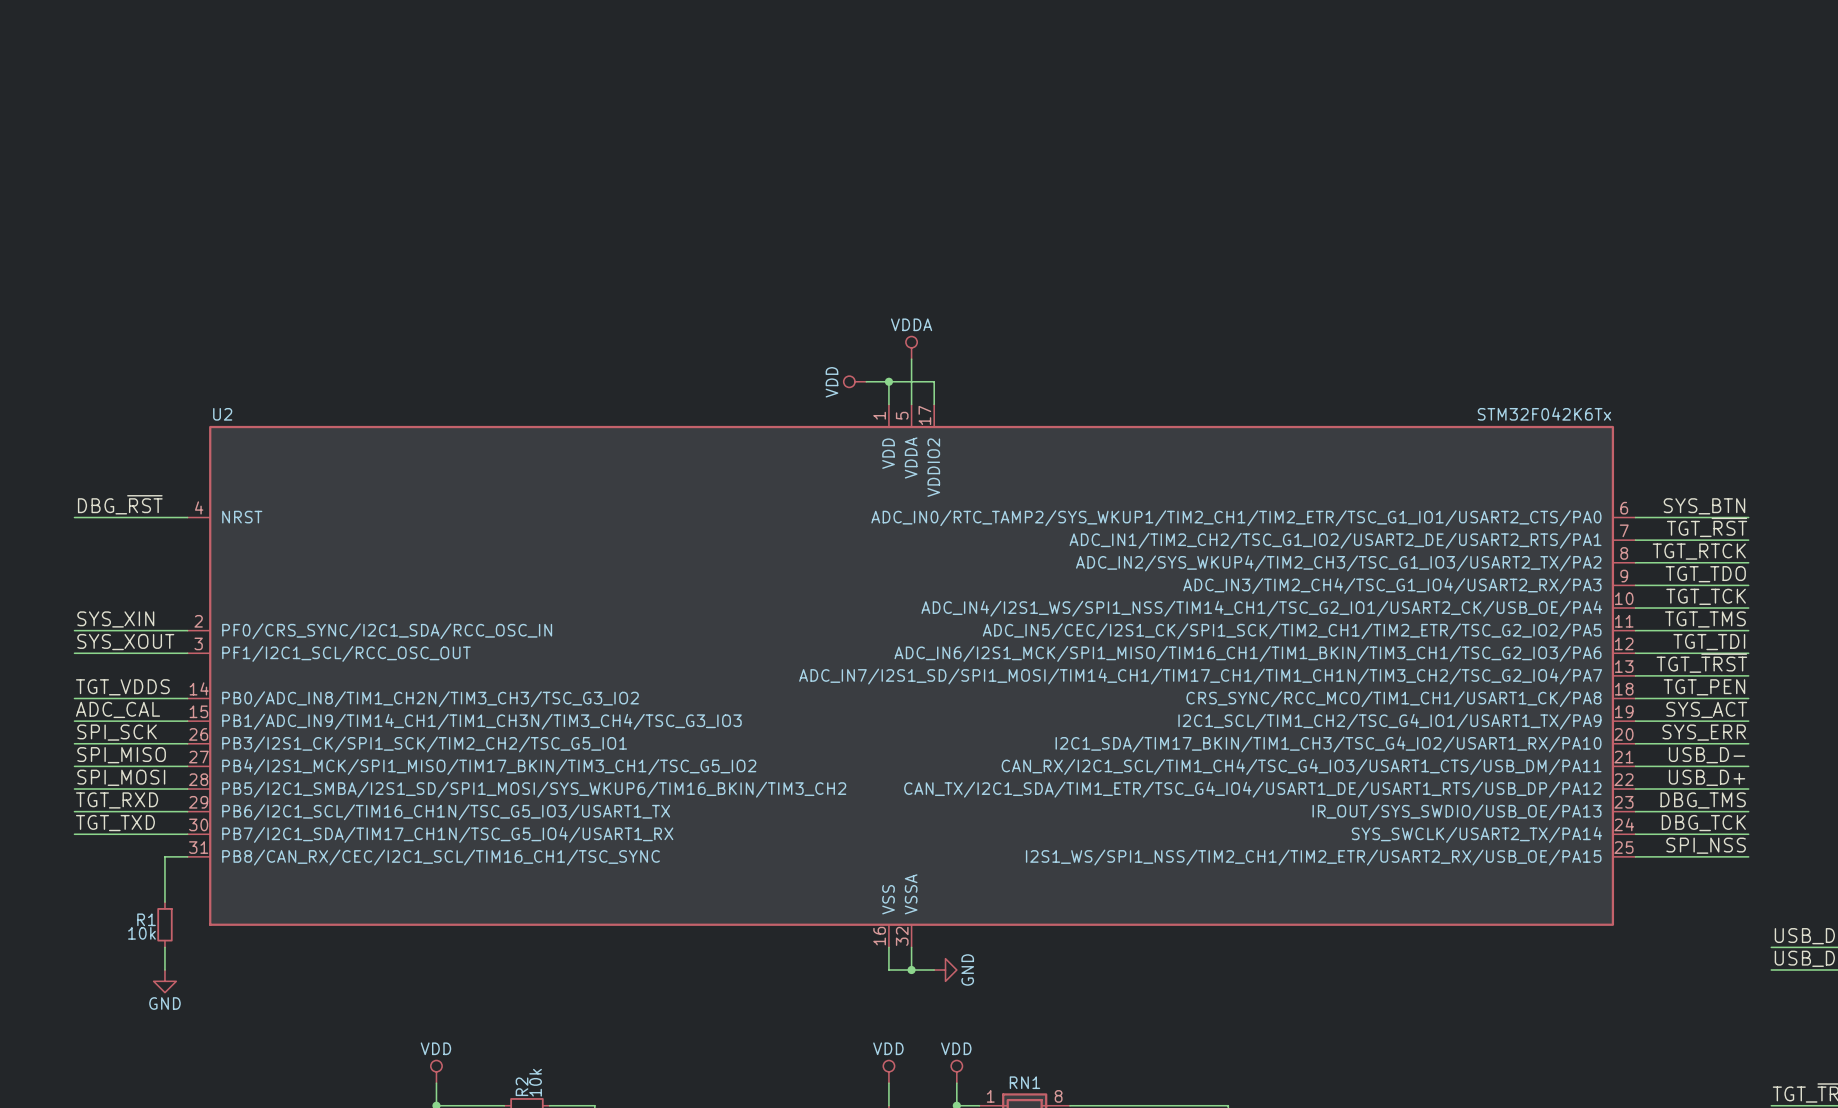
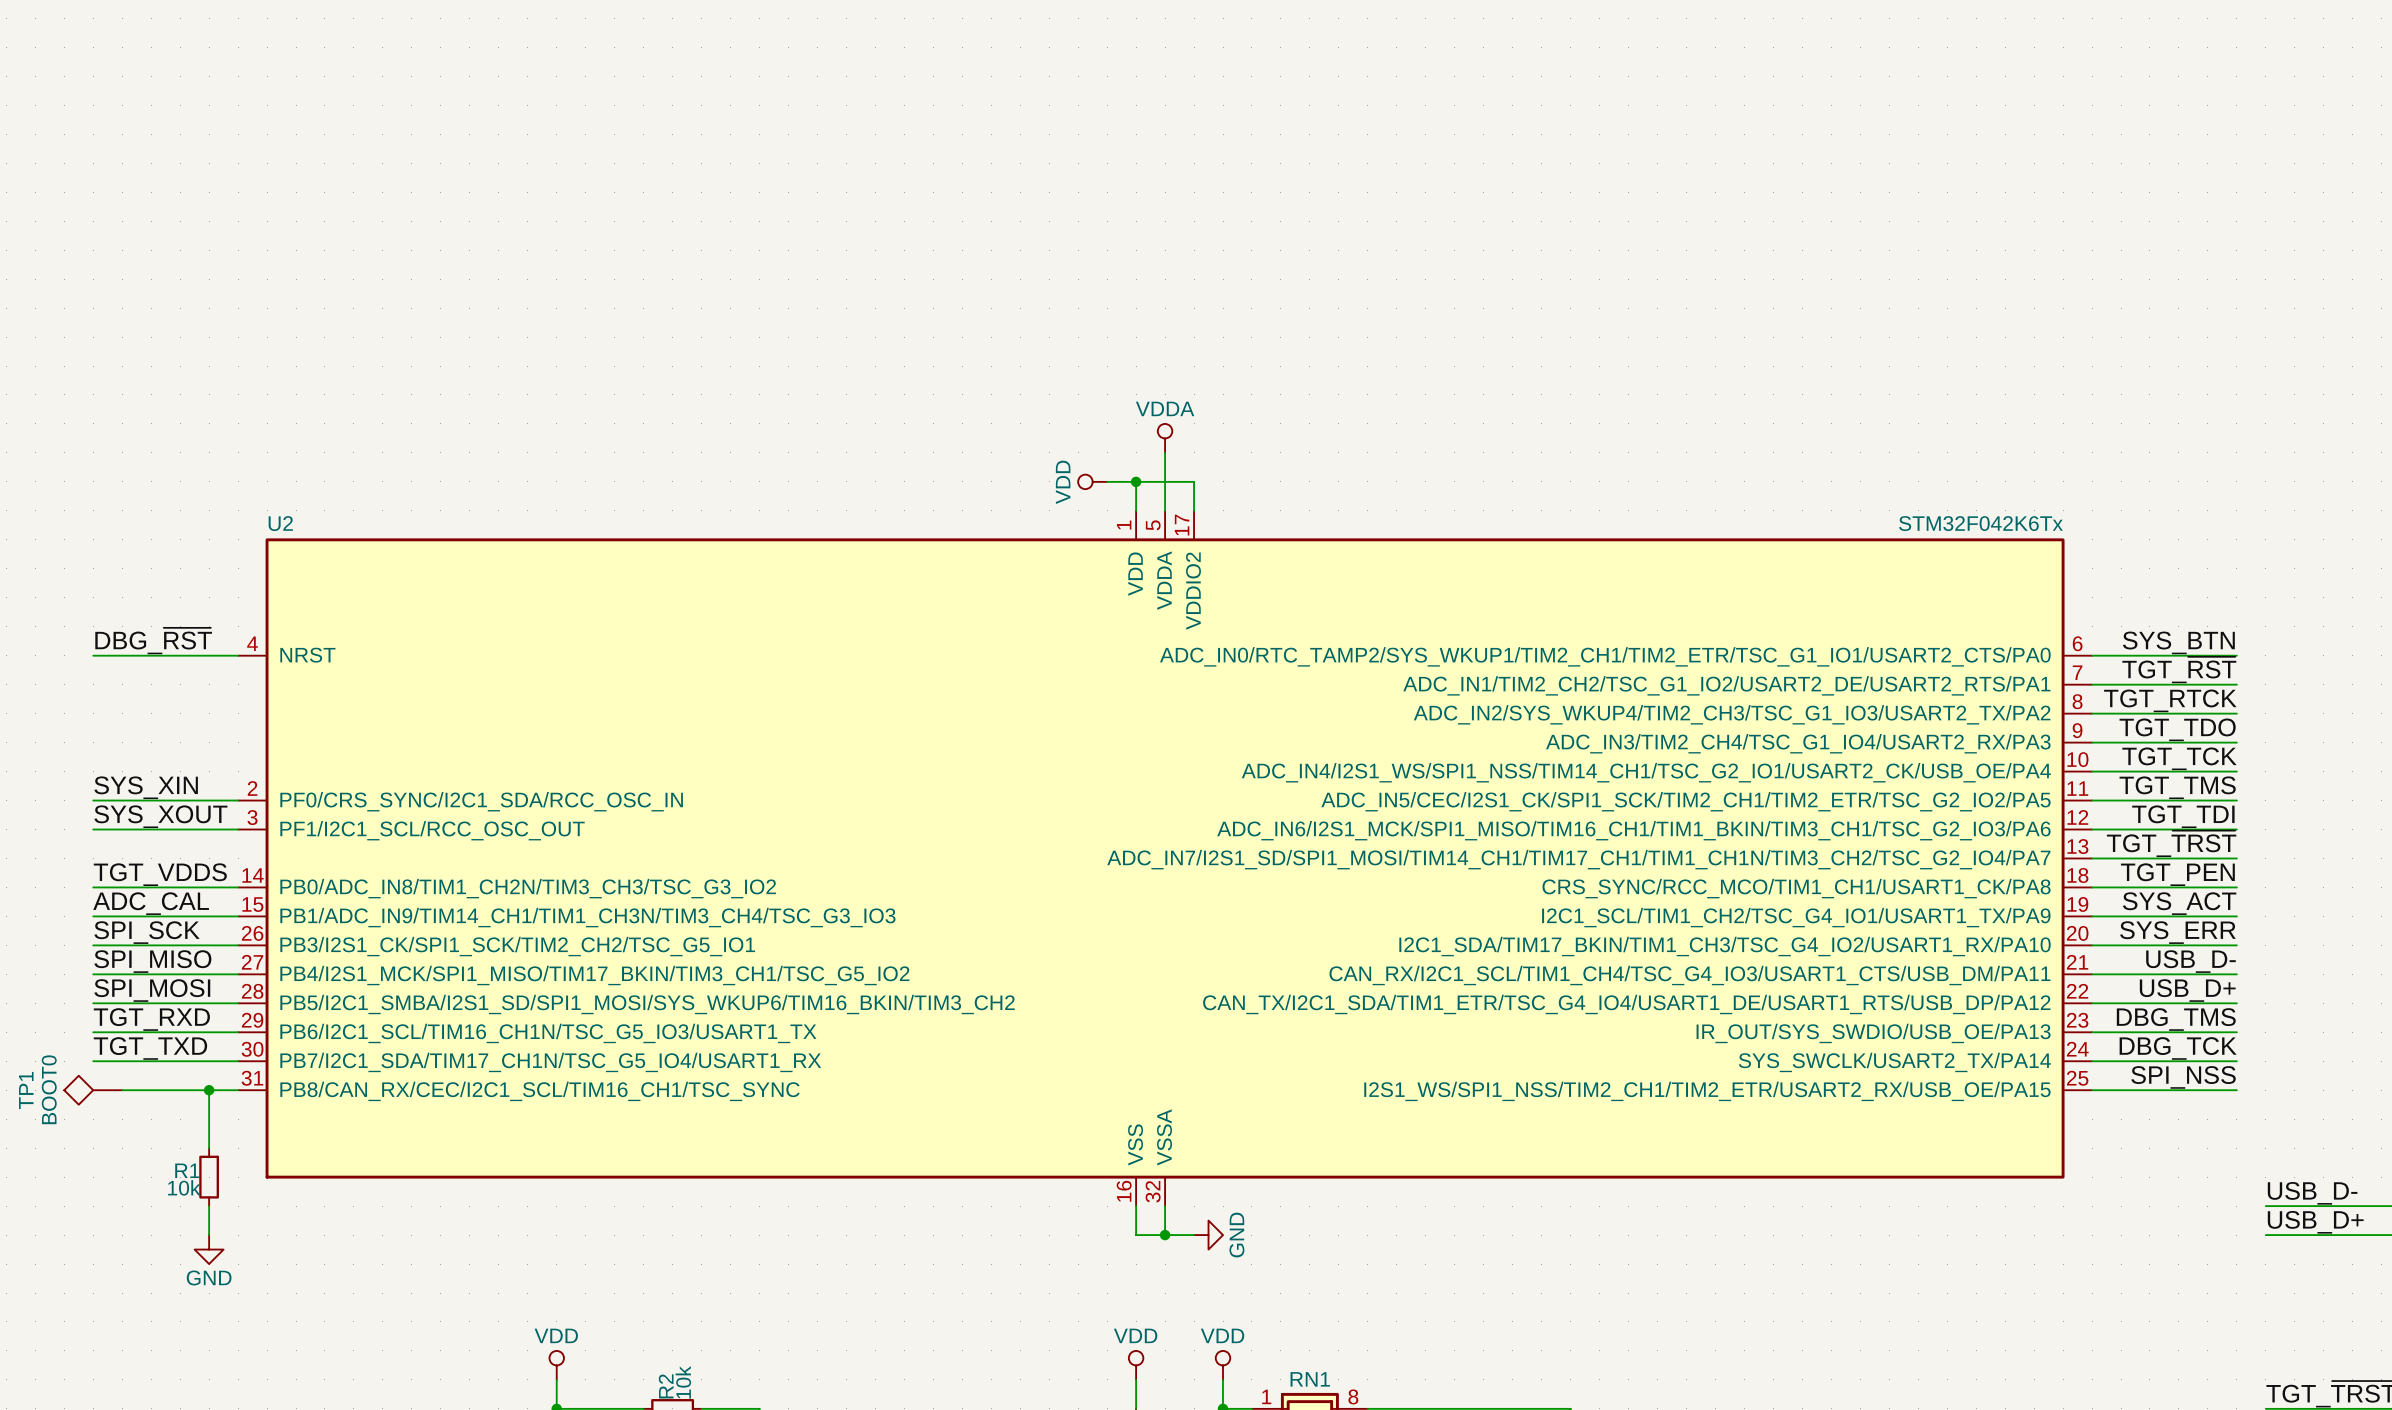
TP1: none -> BOOT0 (93, 1090)
wire: none -> (122, 1090) (209, 1090)
junction: none -> (209, 1090)

